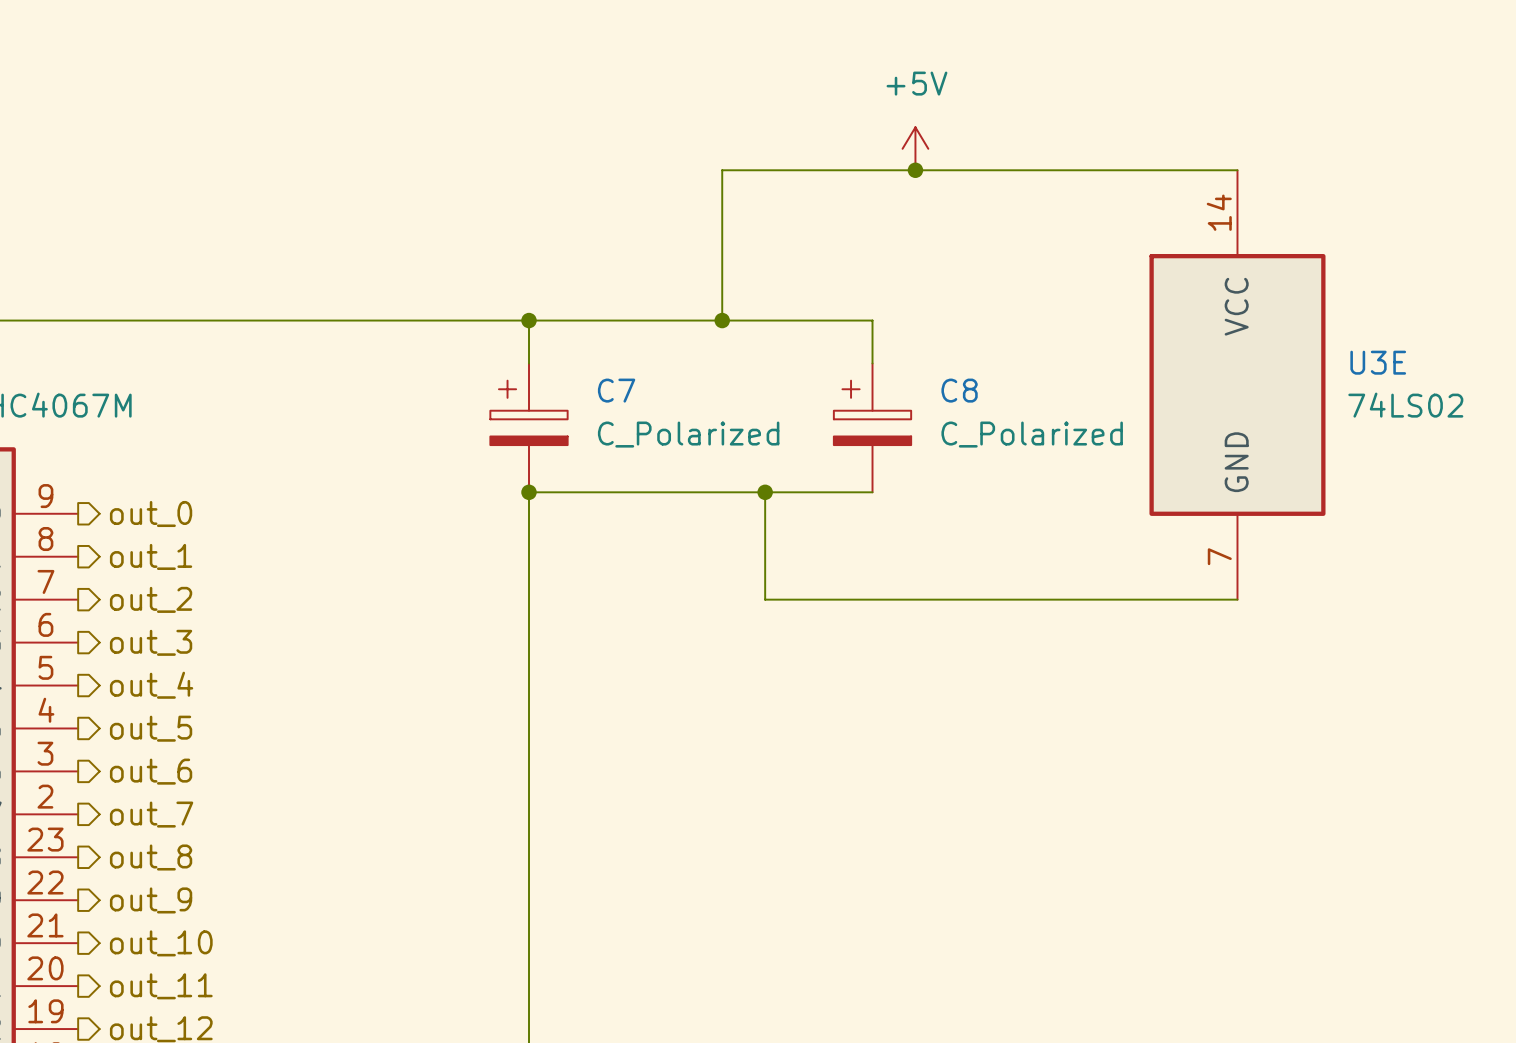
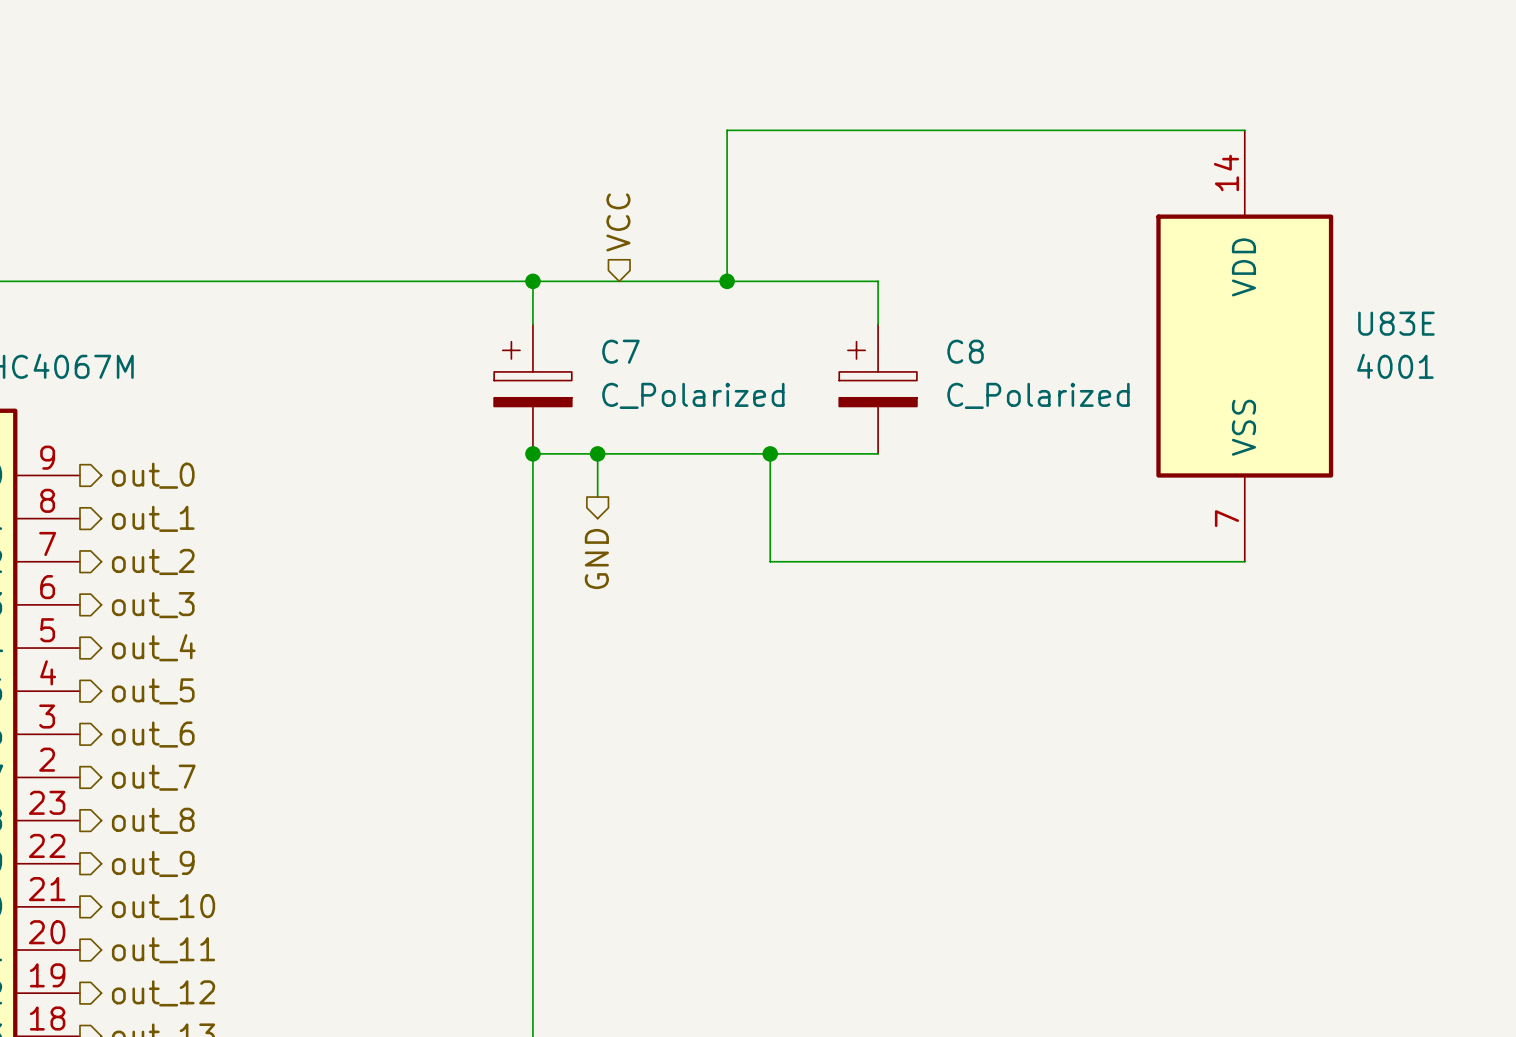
power symbol: +5V (915, 148) -> none
junction: (915, 170) -> none
hierarchical label: none -> VCC (618, 222)
U3E pin name: VCC (1236, 306) -> VDD (1243, 267)
U3E name: U3E (1378, 362) -> U83E (1396, 323)
U3E value: 74LS02 (1405, 405) -> 4001 (1395, 366)
U3E pin name: GND (1236, 462) -> VSS (1243, 427)
wire: none -> (597, 453) (597, 497)
junction: none -> (597, 453)
hierarchical label: none -> GND (596, 559)

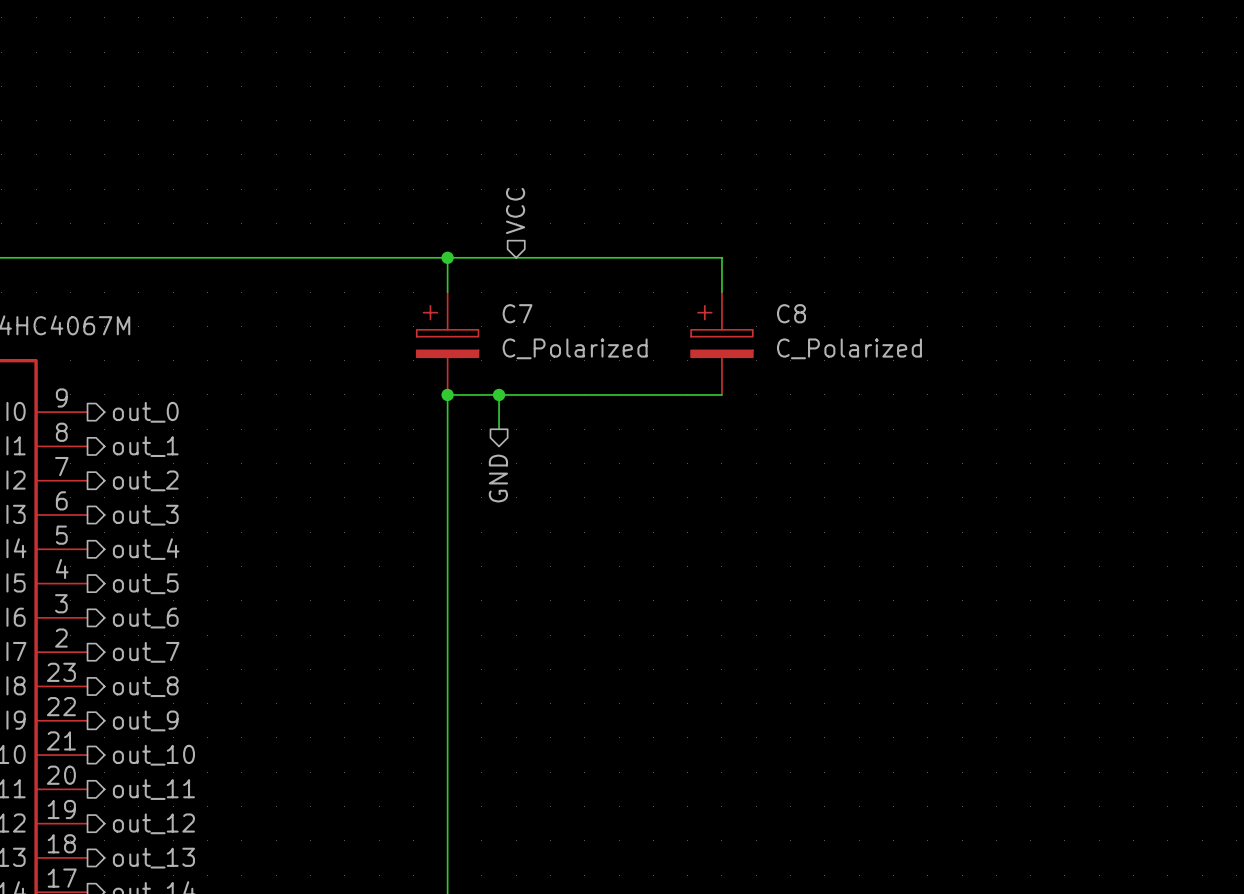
wire: (1244, 130) (727, 130) (727, 281) -> none
junction: (727, 281) -> none
U83E: 4001 (1244, 346) -> none
wire: (770, 453) (770, 561) (1244, 561) -> none
junction: (770, 453) -> none

